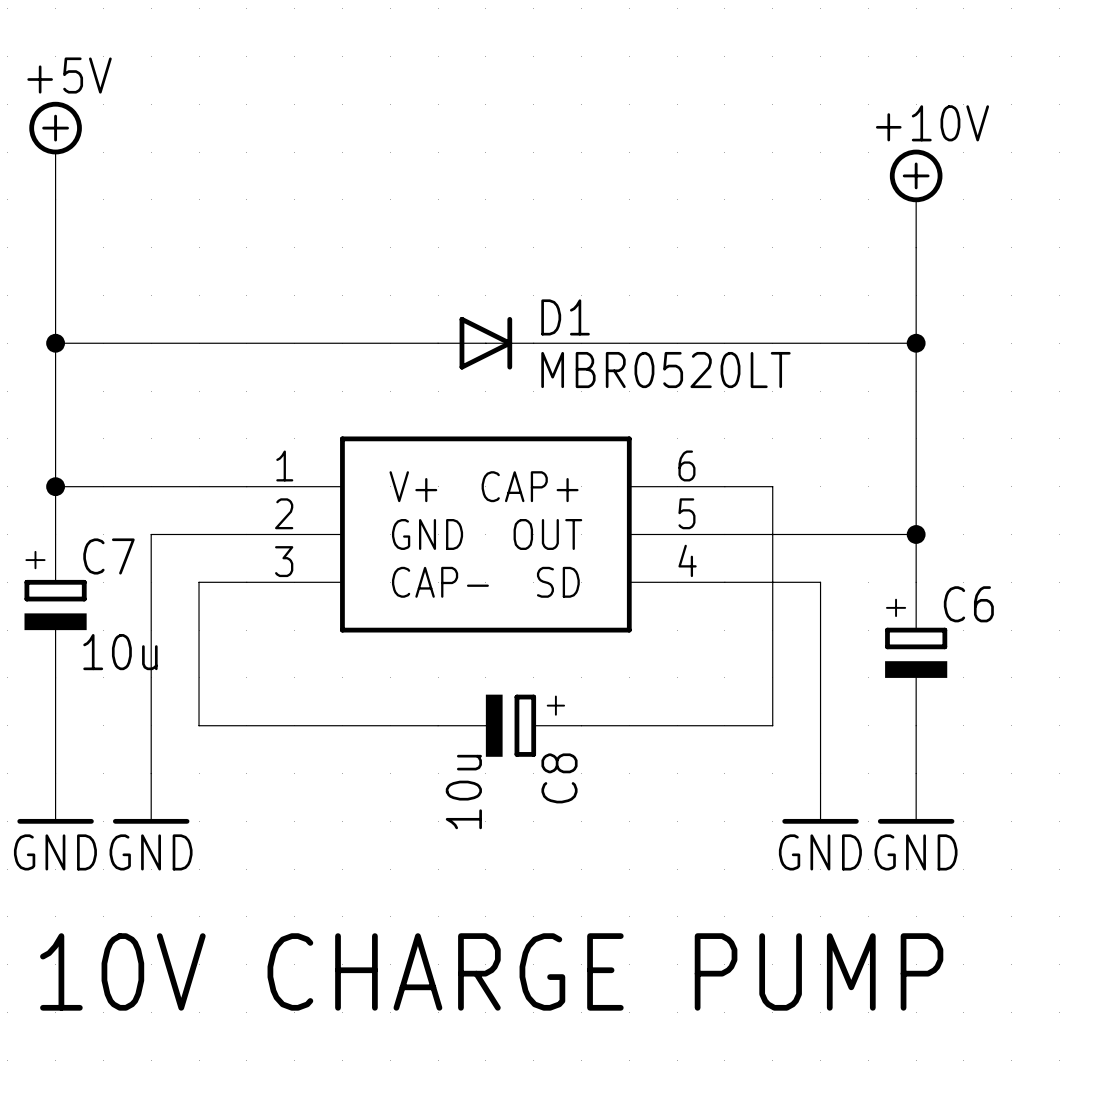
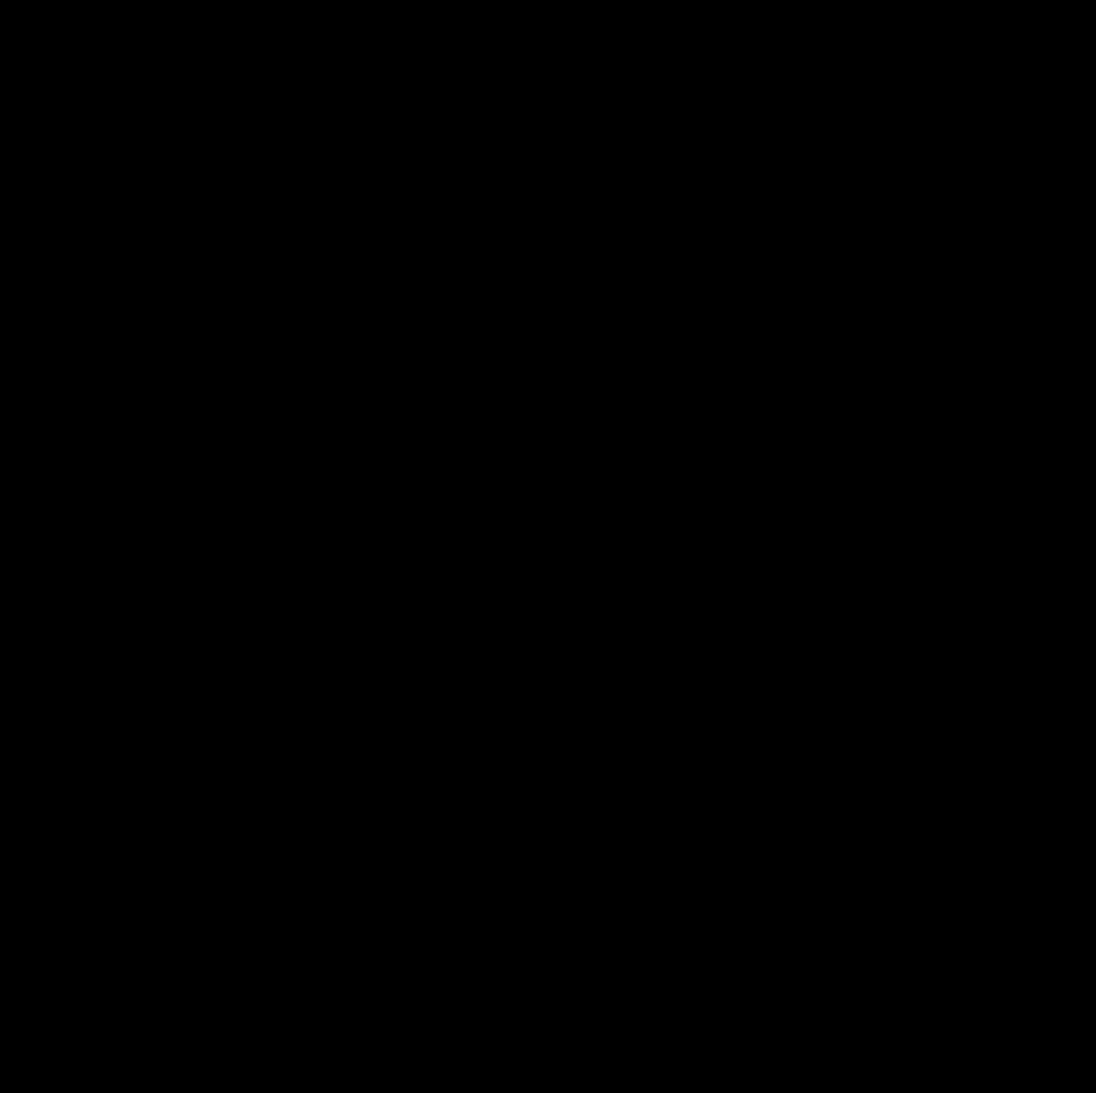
power symbol: +5V (55, 150) -> none
power symbol: +10V (916, 198) -> none
wire: (55, 199) (55, 534) -> none
wire: (916, 247) (916, 582) -> none
wire: (55, 343) (438, 343) -> none
junction: (55, 343) -> none
D1: MBR0520LT (485, 343) -> none
wire: (533, 343) (916, 343) -> none
junction: (916, 343) -> none
wire: (55, 486) (246, 486) -> none
junction: (55, 486) -> none
wire: (724, 486) (772, 486) (772, 725) (581, 725) -> none
wire: (246, 534) (151, 534) (151, 773) -> none
part: (485, 534) -> none
wire: (724, 534) (916, 534) -> none
junction: (916, 534) -> none
wire: (246, 582) (199, 582) (199, 725) (438, 725) -> none
wire: (724, 582) (820, 582) (820, 773) -> none
C7: 10u (55, 606) -> none
C6: (916, 654) -> none
wire: (55, 677) (55, 773) -> none
C8: 10u (509, 725) -> none
wire: (916, 725) (916, 773) -> none
power symbol: GND (55, 798) -> none
power symbol: GND (151, 798) -> none
power symbol: GND (820, 798) -> none
power symbol: GND (916, 798) -> none
text: 10V CHARGE PUMP (491, 971) -> none

